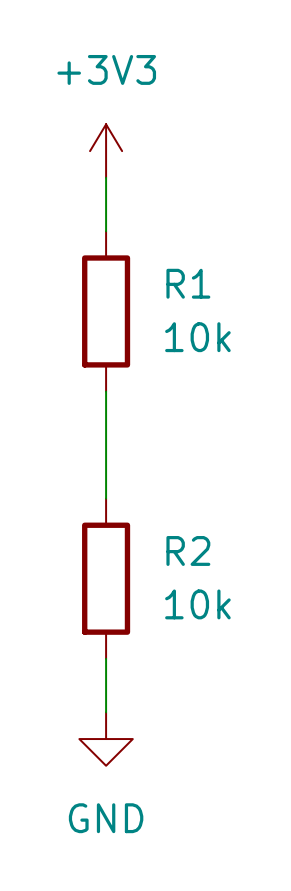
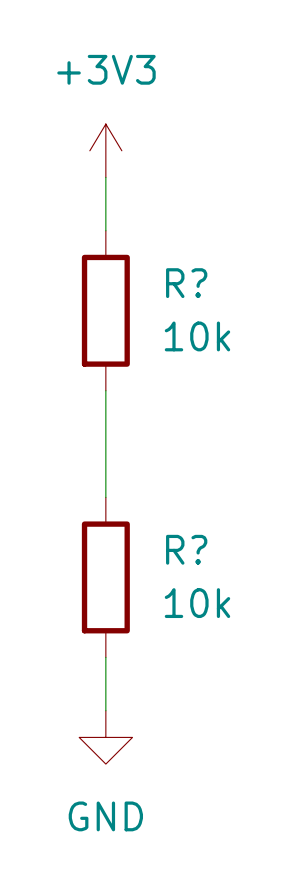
R1 name: R1 (188, 283) -> R? (186, 283)
R2 name: R2 (188, 550) -> R? (186, 549)

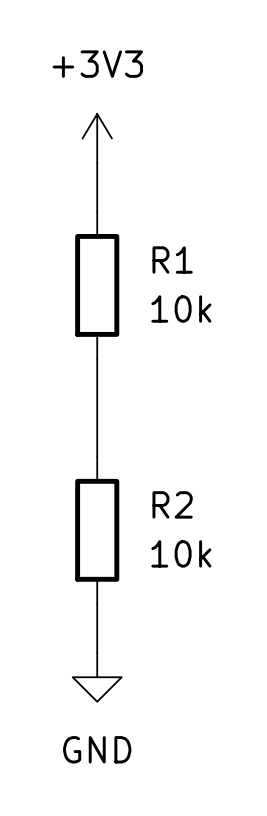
R? name: R? (186, 283) -> R1 (172, 260)
R? name: R? (186, 549) -> R2 (172, 504)

